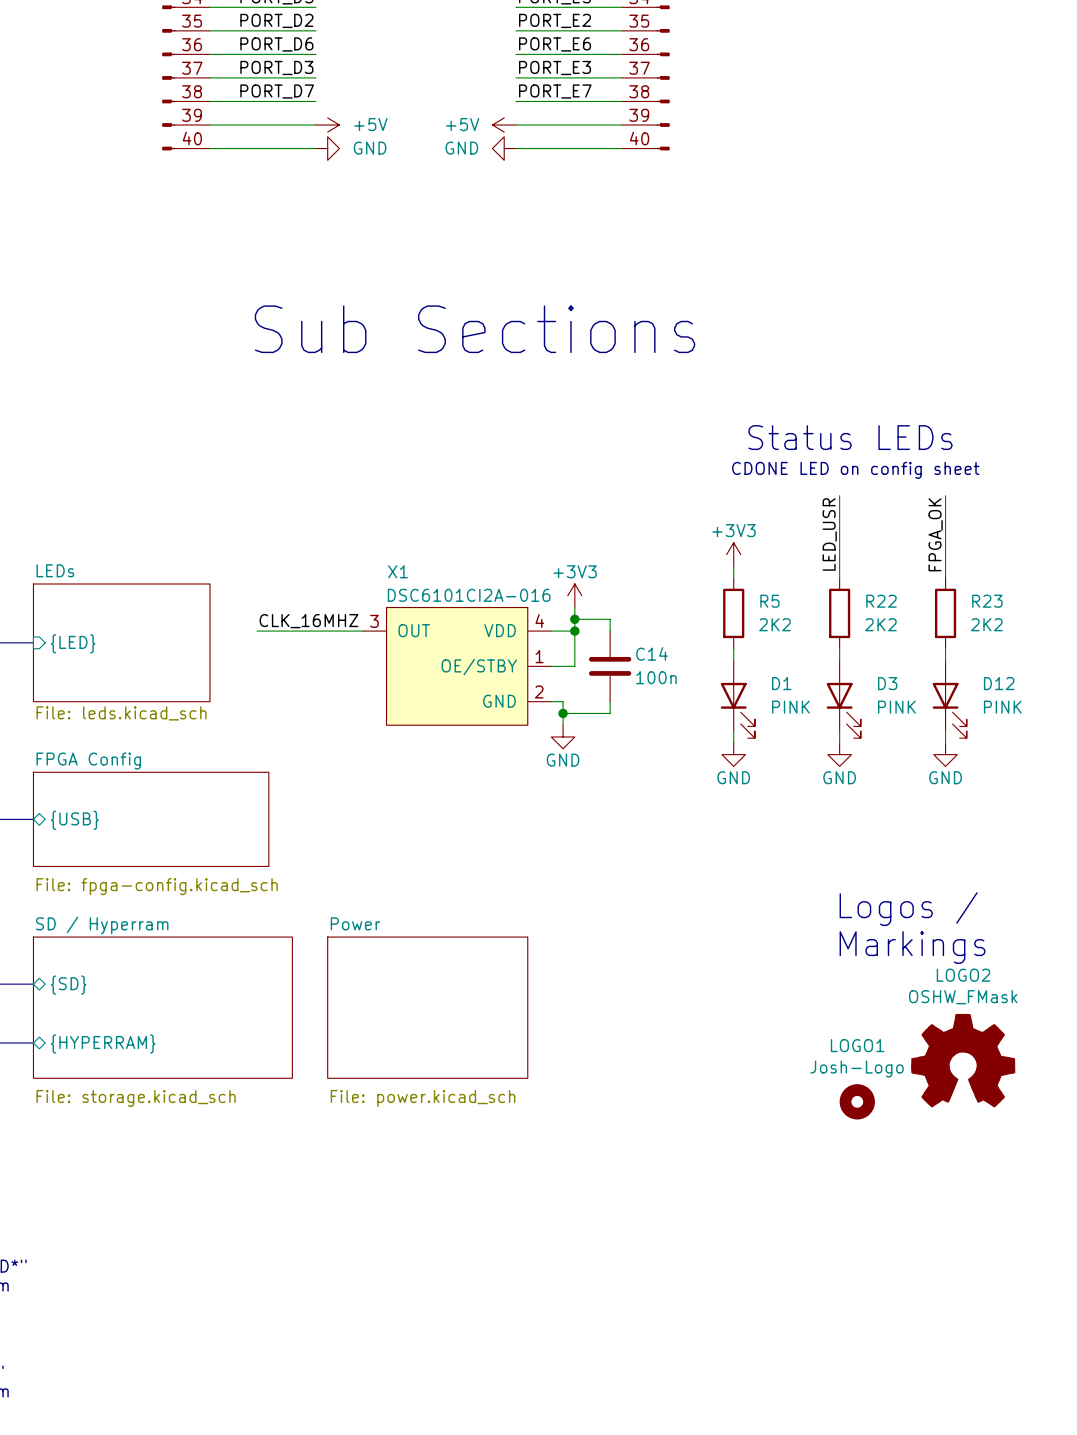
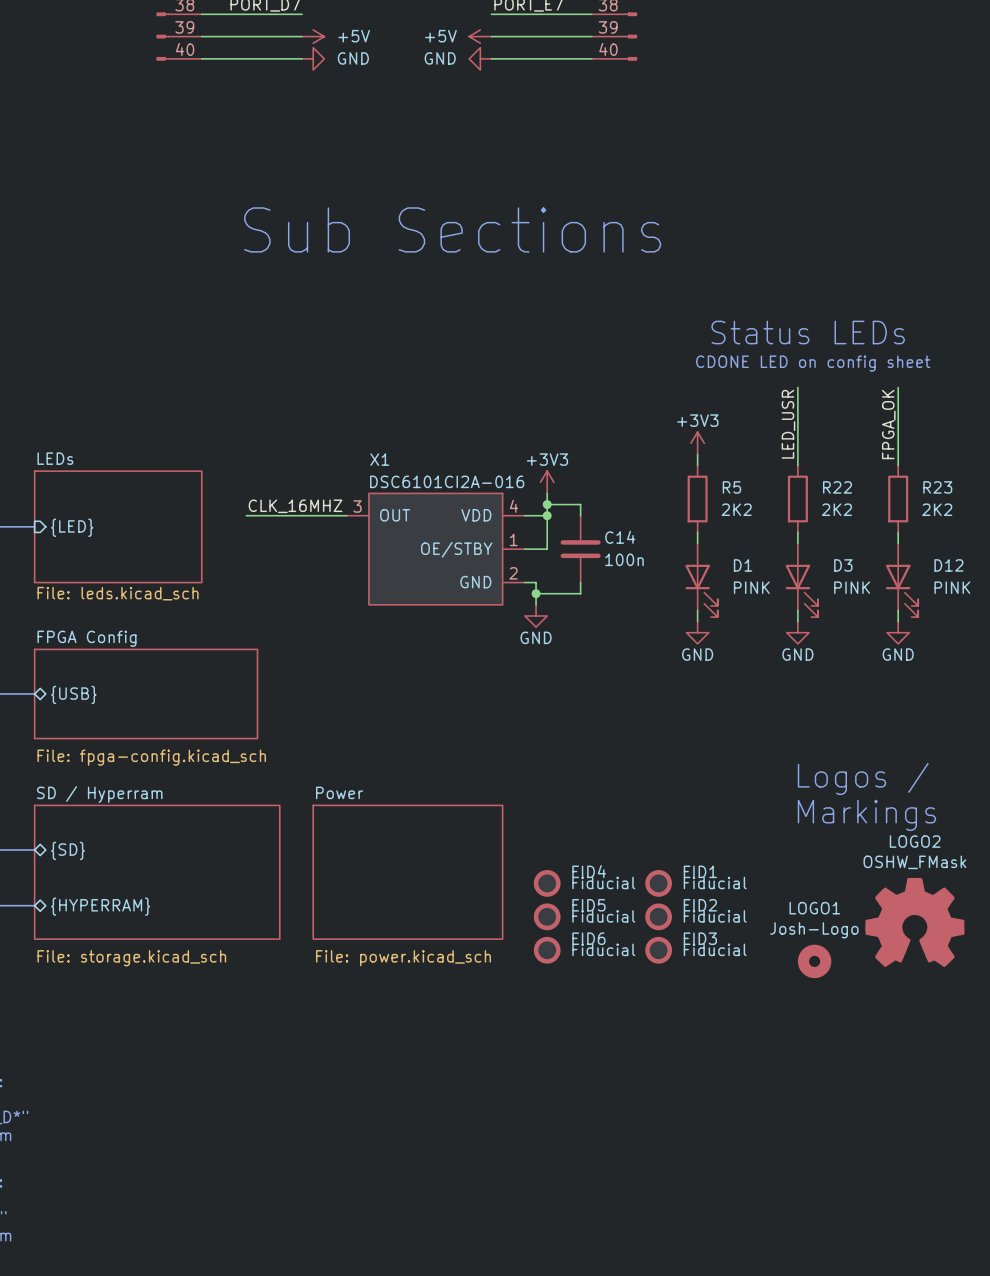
FID4: none -> Fiducial (547, 883)
FID1: none -> Fiducial (658, 883)
FID5: none -> Fiducial (547, 916)
FID2: none -> Fiducial (658, 916)
FID6: none -> Fiducial (547, 950)
FID3: none -> Fiducial (658, 950)

